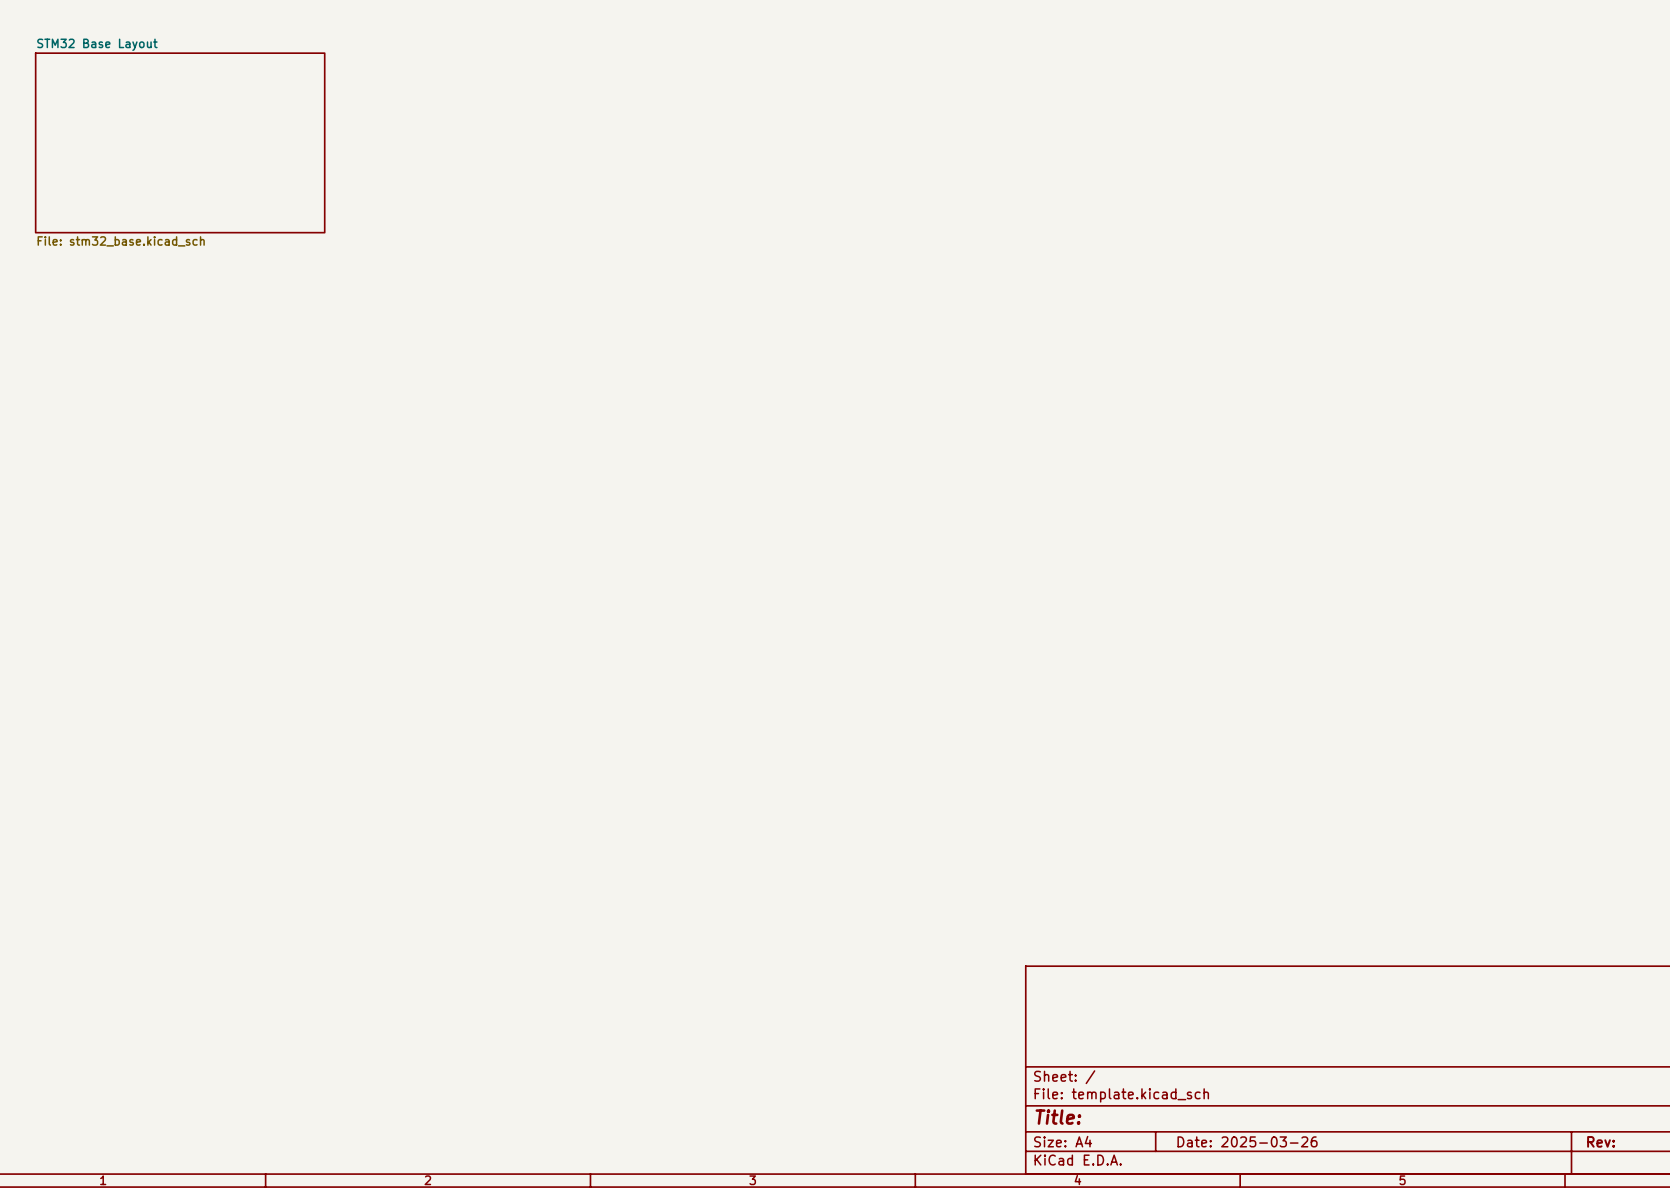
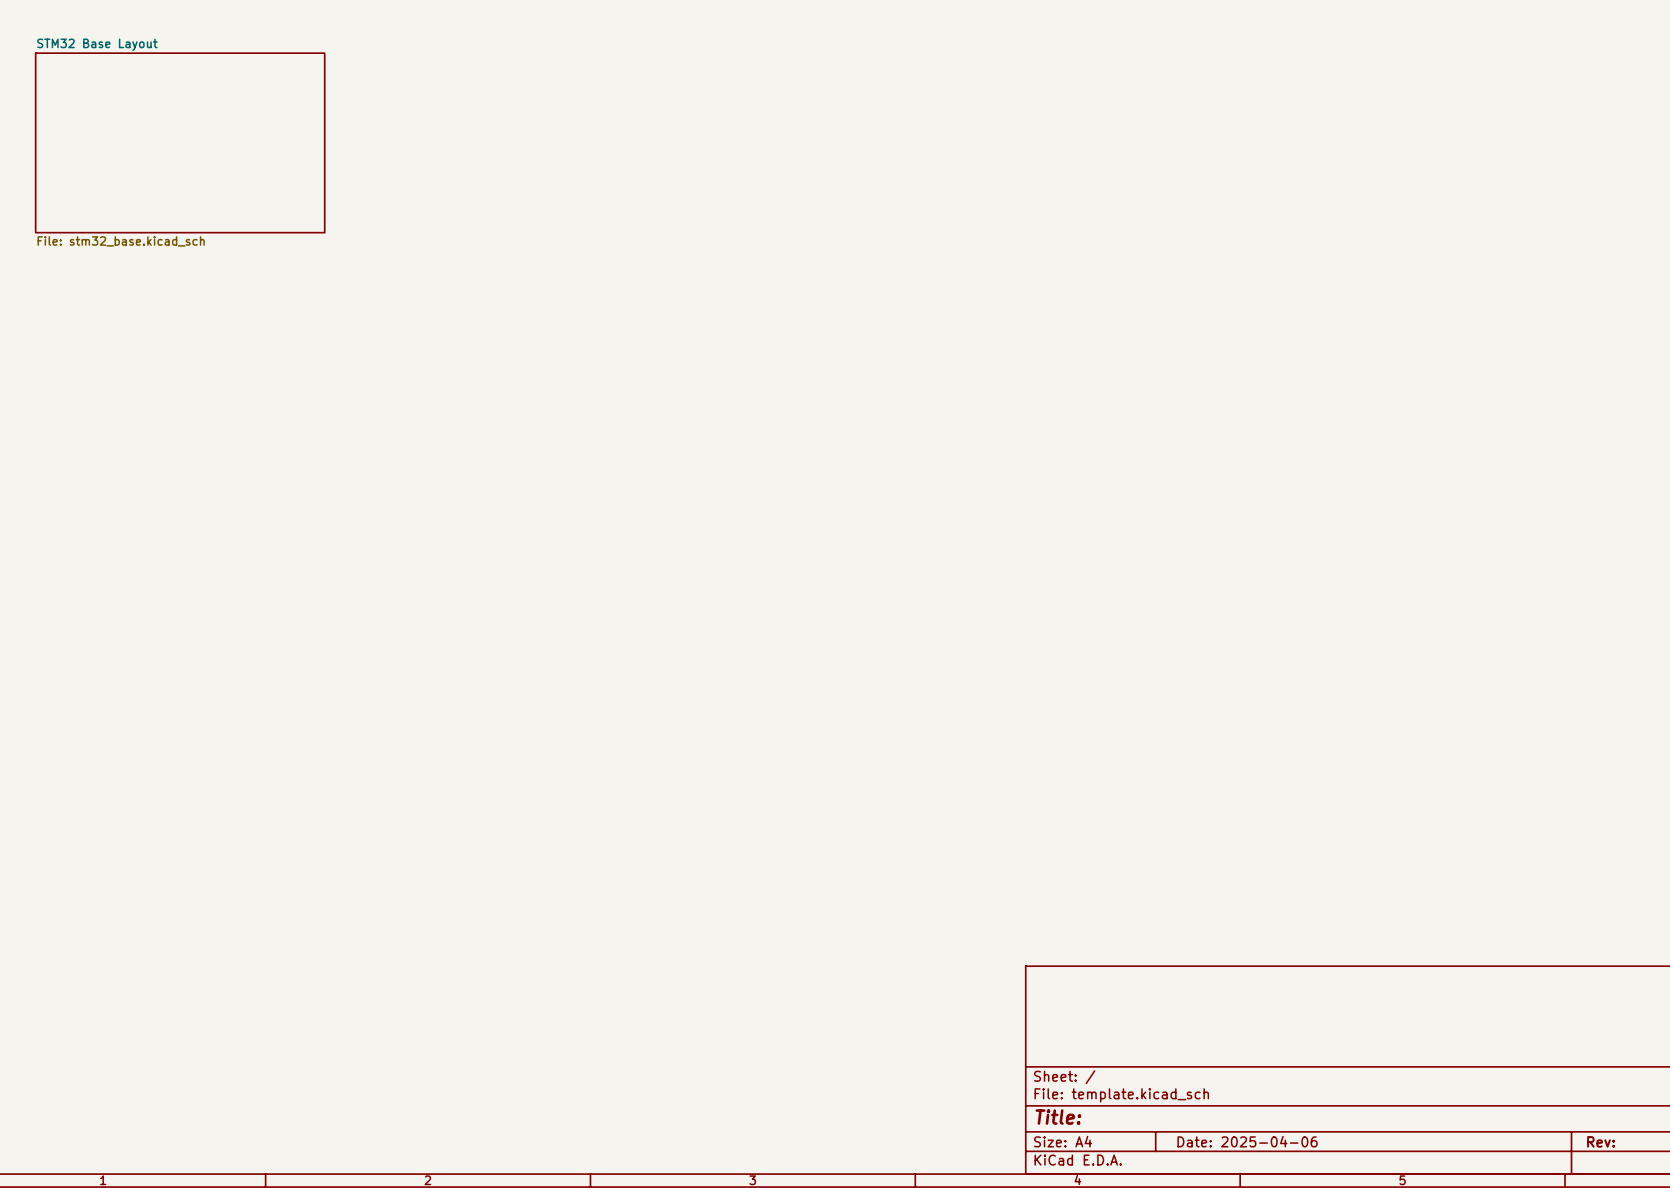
title block: Date: 2025-03-26 (1247, 1141) -> Date: 2025-04-06 (1247, 1141)

